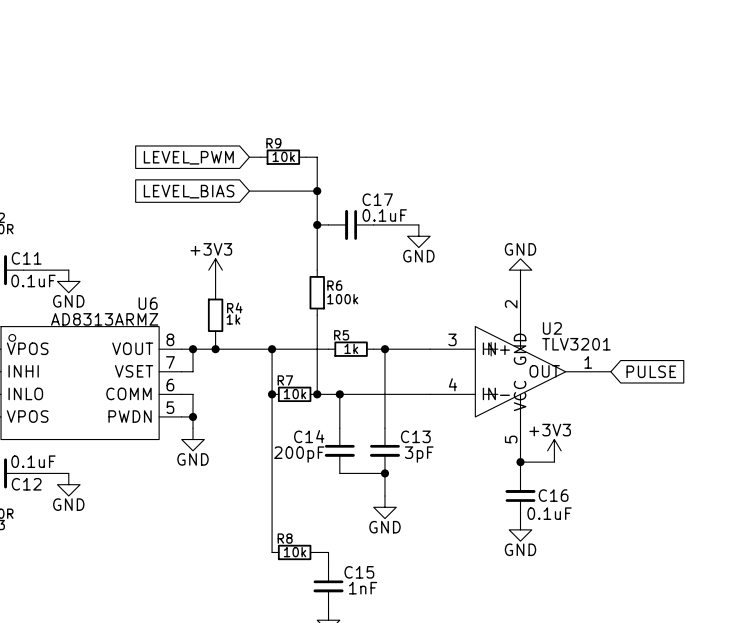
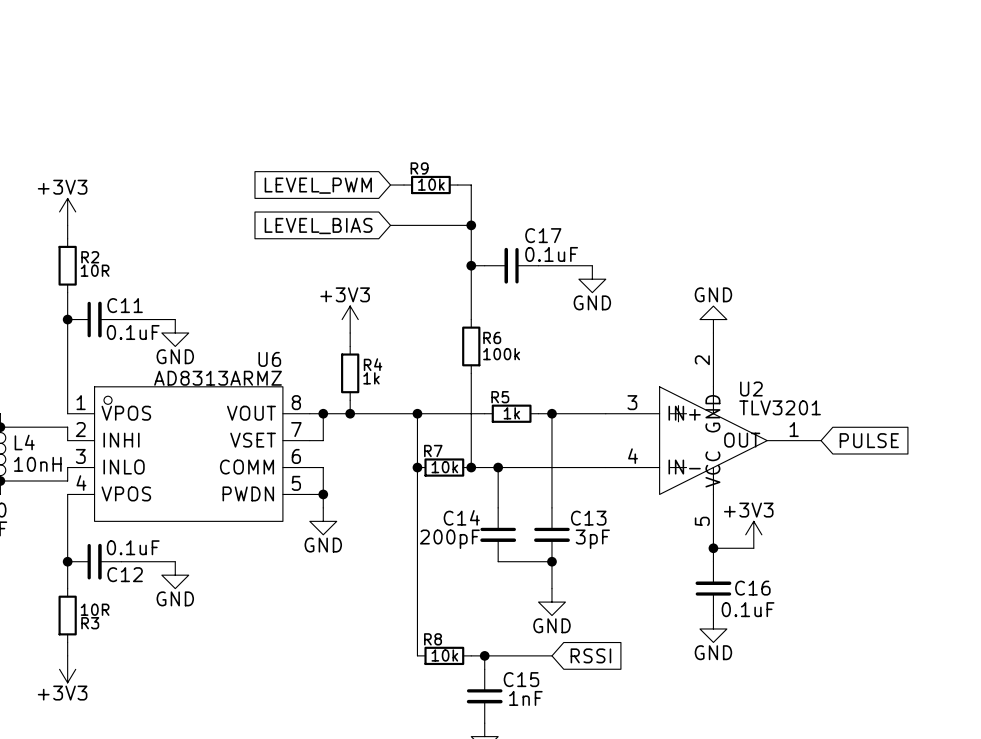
wire: none -> (484, 655) (551, 655)
junction: none -> (484, 655)
global label: none -> RSSI (590, 655)

